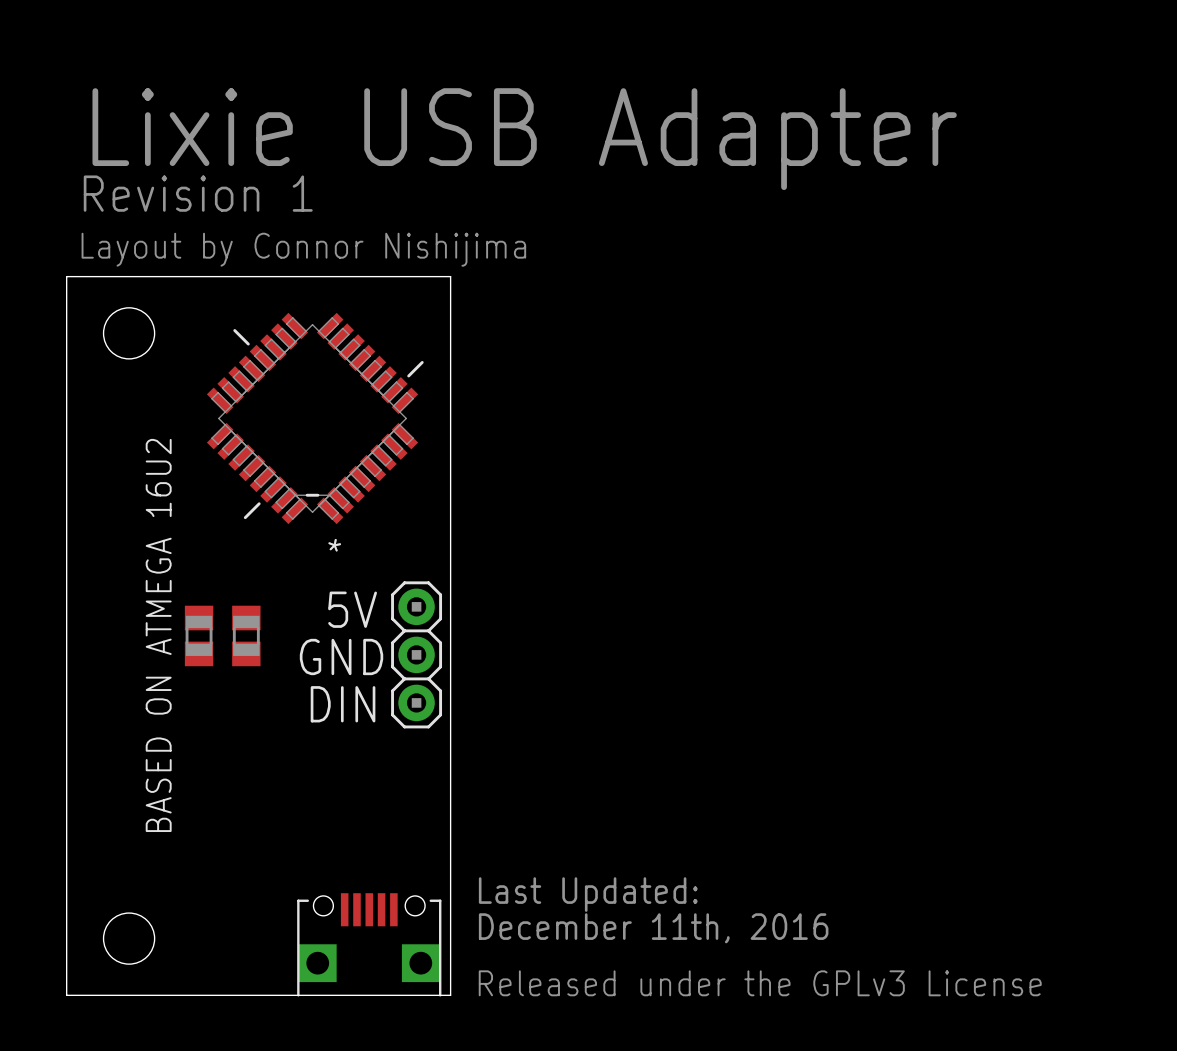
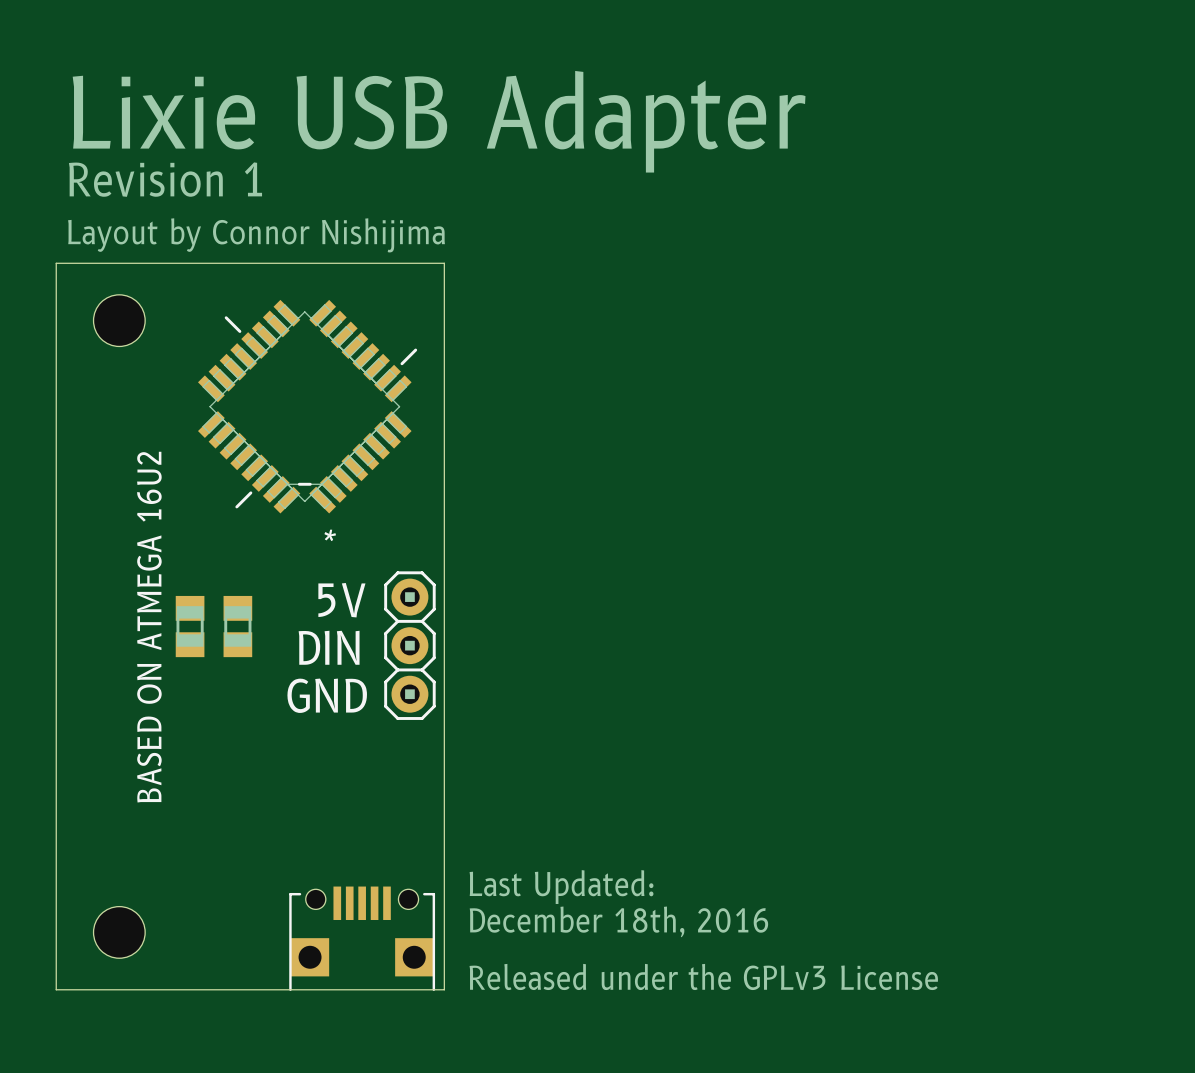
text: GND (341, 656) -> DIN (329, 647)
text: DIN (343, 704) -> GND (327, 695)
text: December 11th, 2016 (653, 928) -> December 18th, 2016 (618, 921)

